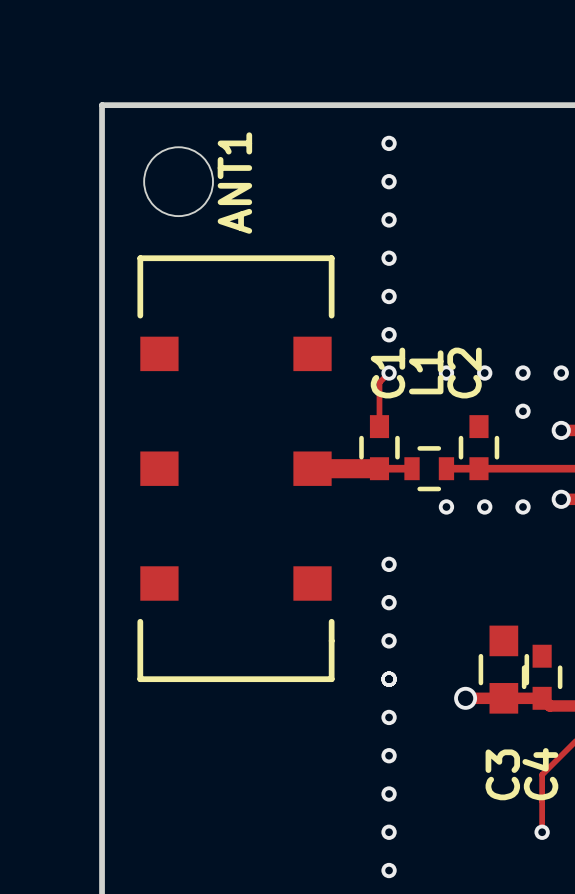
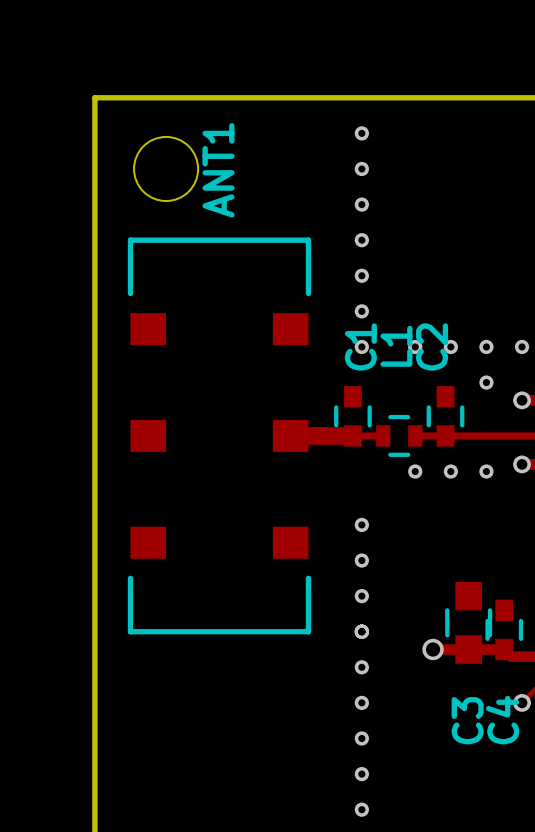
track: (389, 373) (379, 382) (379, 426) -> none
track: (561, 755) (542, 774) (542, 832) -> none
via: none -> (522, 702)
via: (542, 832) -> none

